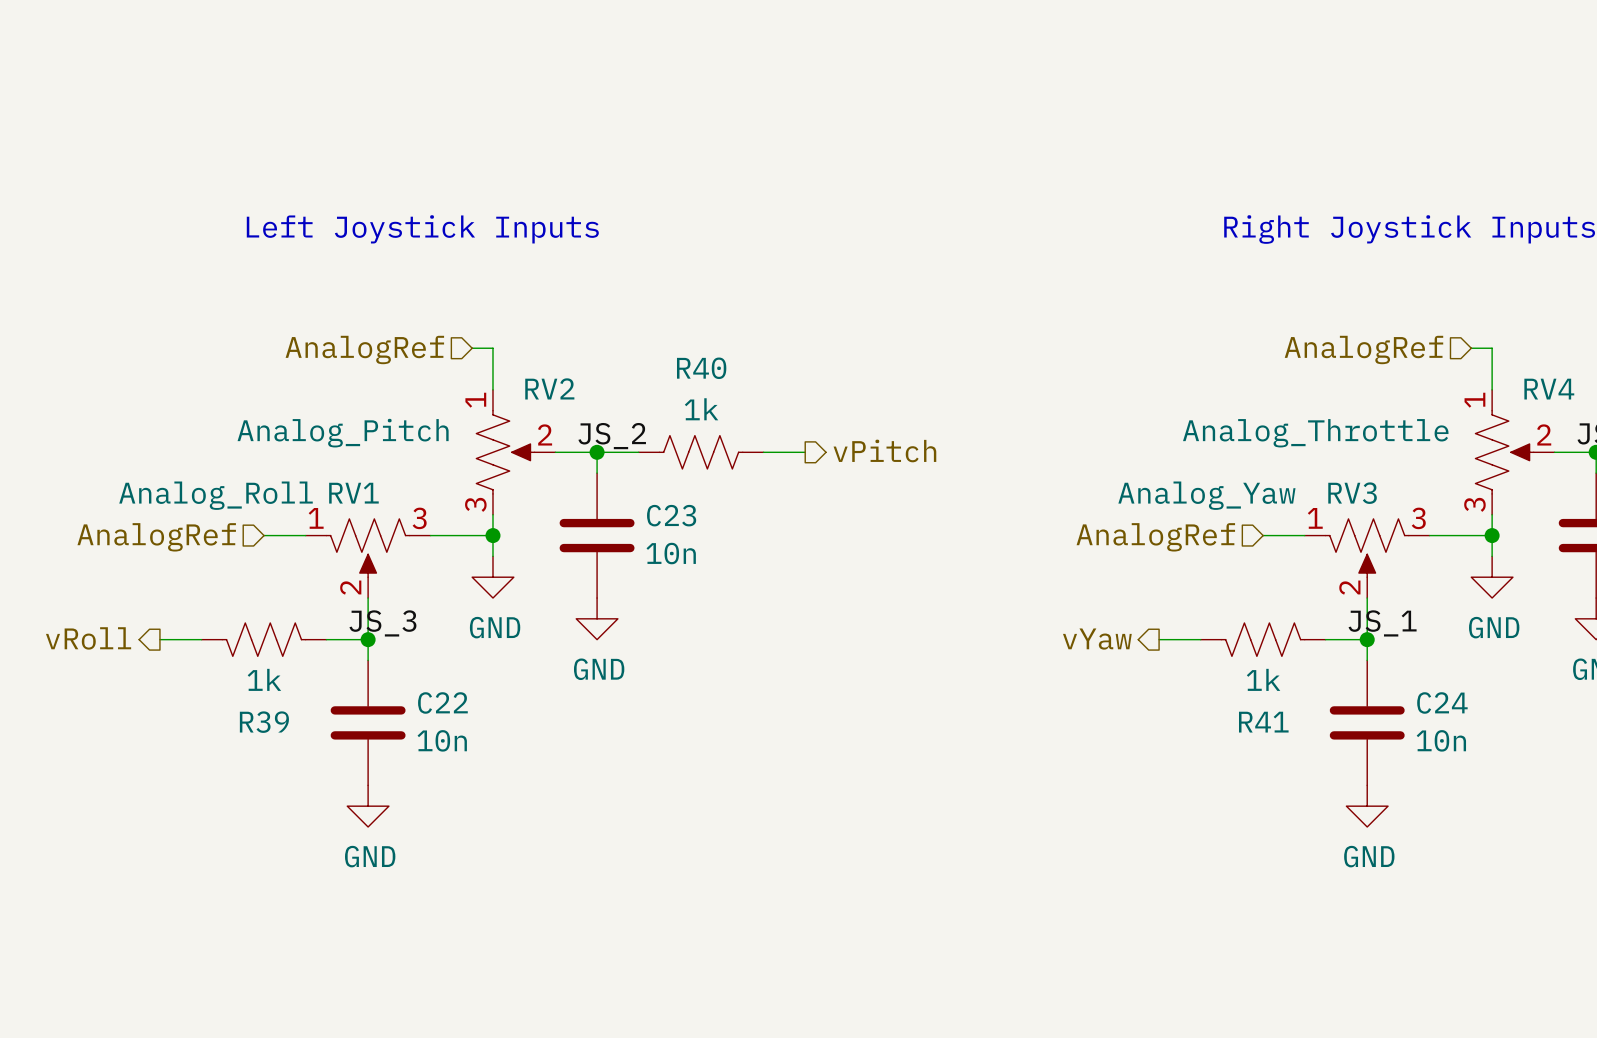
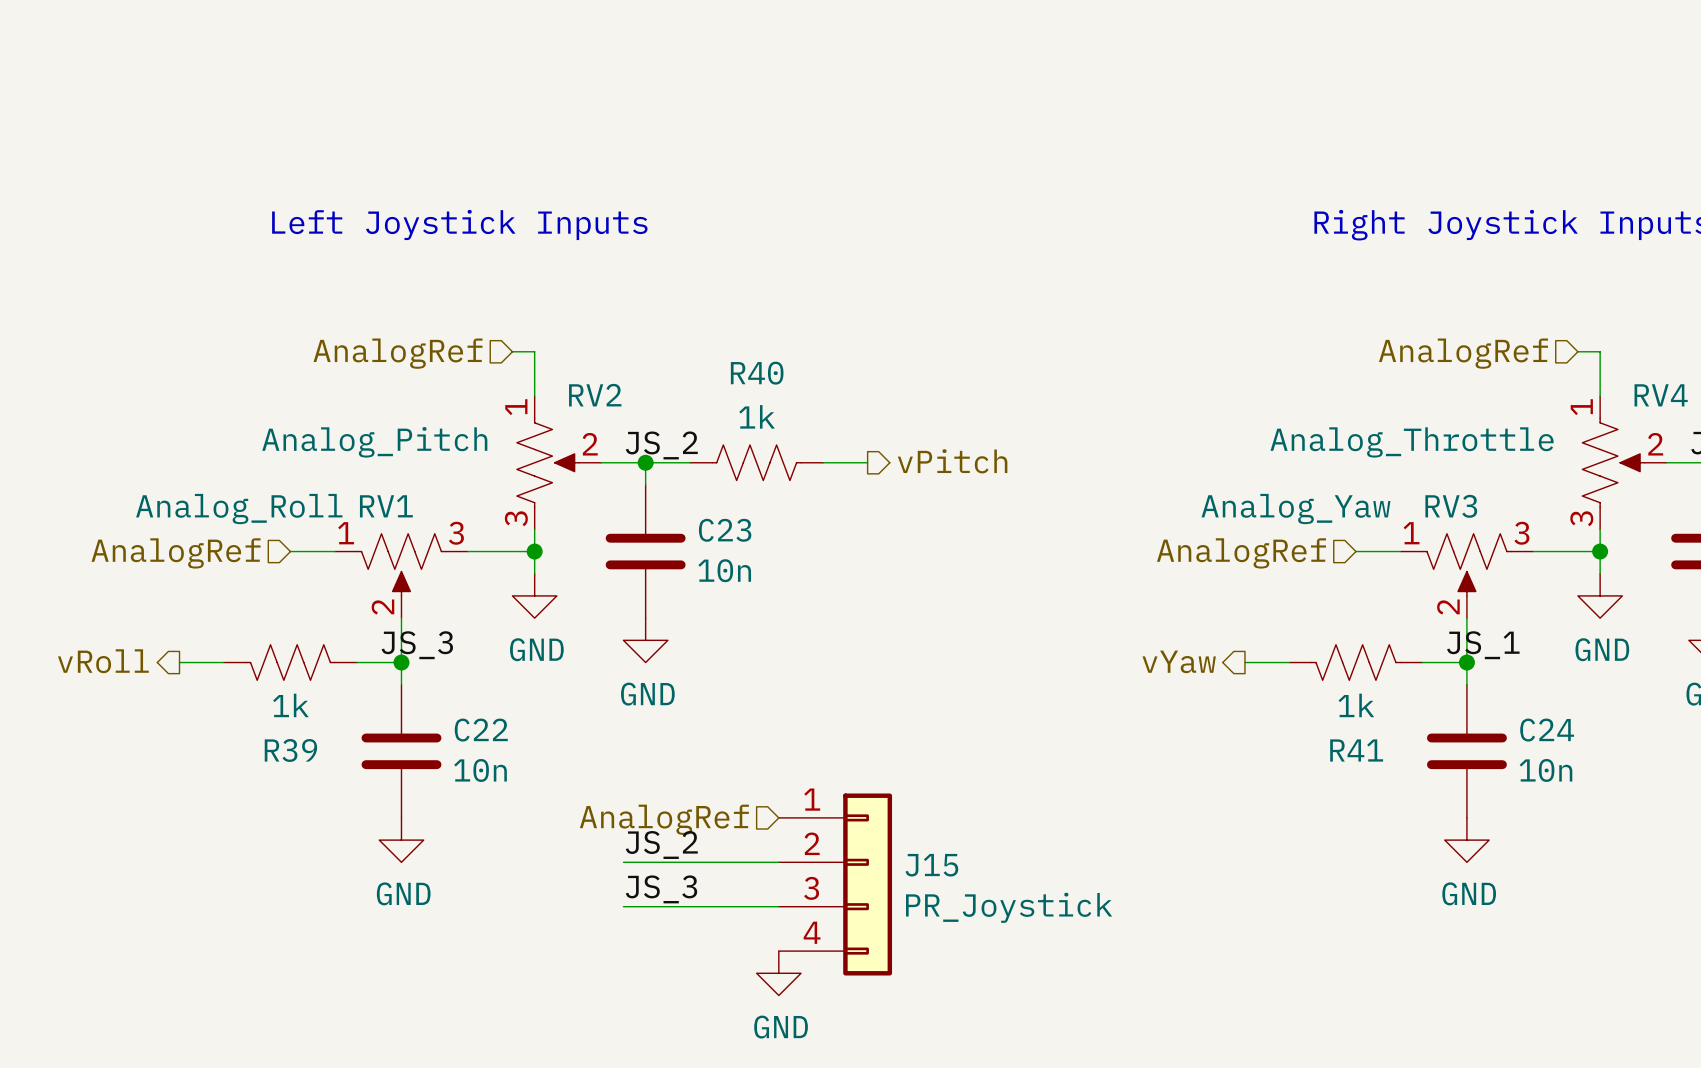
hierarchical label: none -> AnalogRef (664, 819)
label: none -> JS_2 (661, 844)
wire: none -> (623, 862) (778, 862)
J15: none -> PR_Joystick (835, 884)
label: none -> JS_3 (661, 889)
wire: none -> (623, 906) (778, 906)
power symbol: none -> GND (778, 973)

